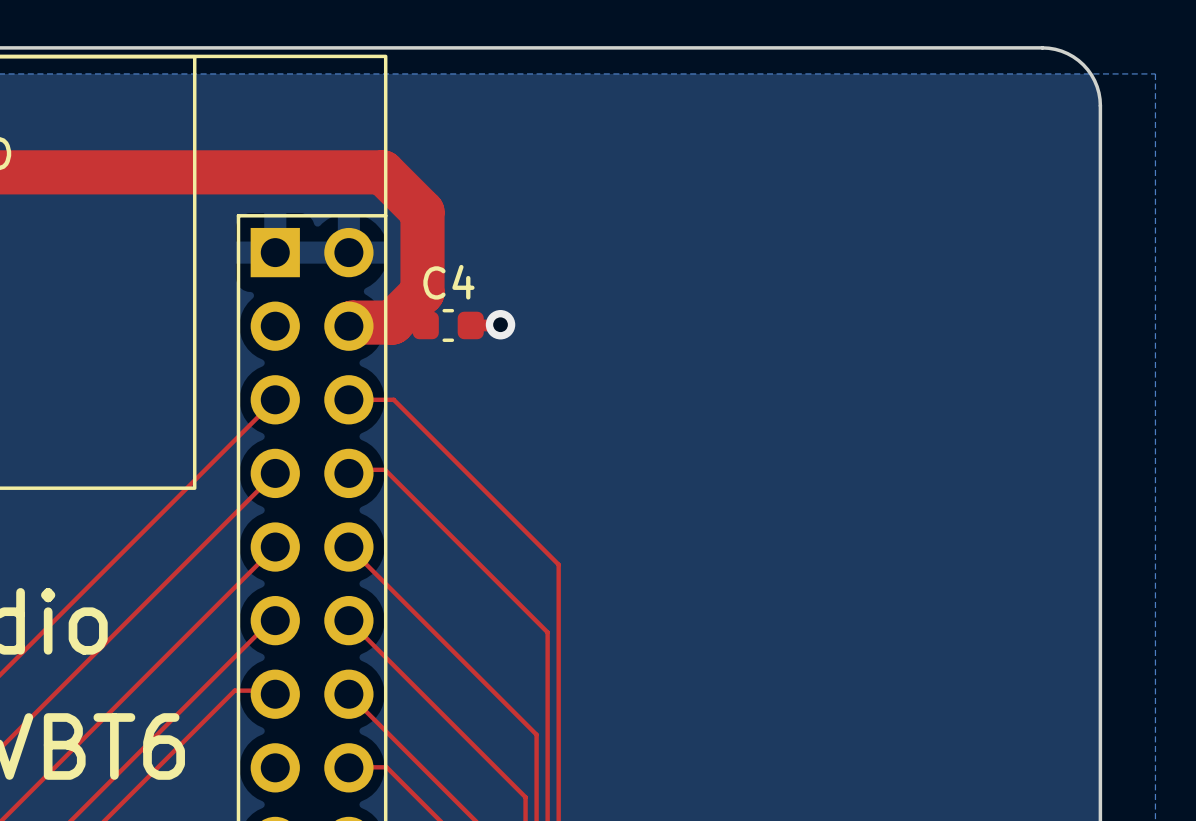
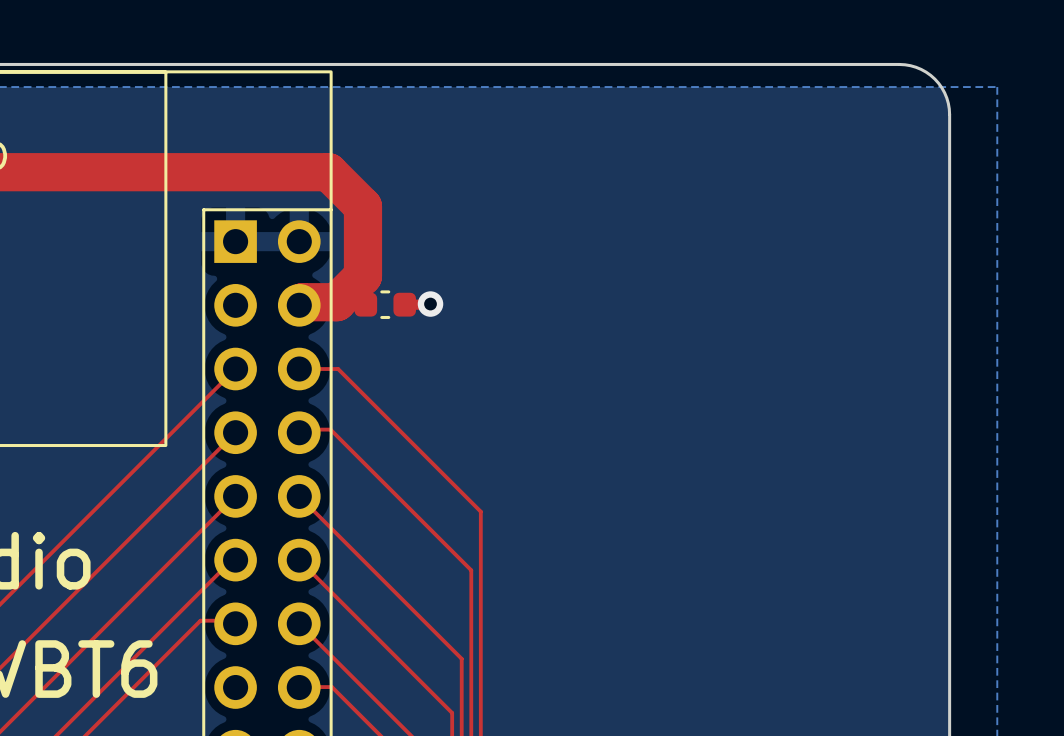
C4 name: C4 (448, 282) -> none

